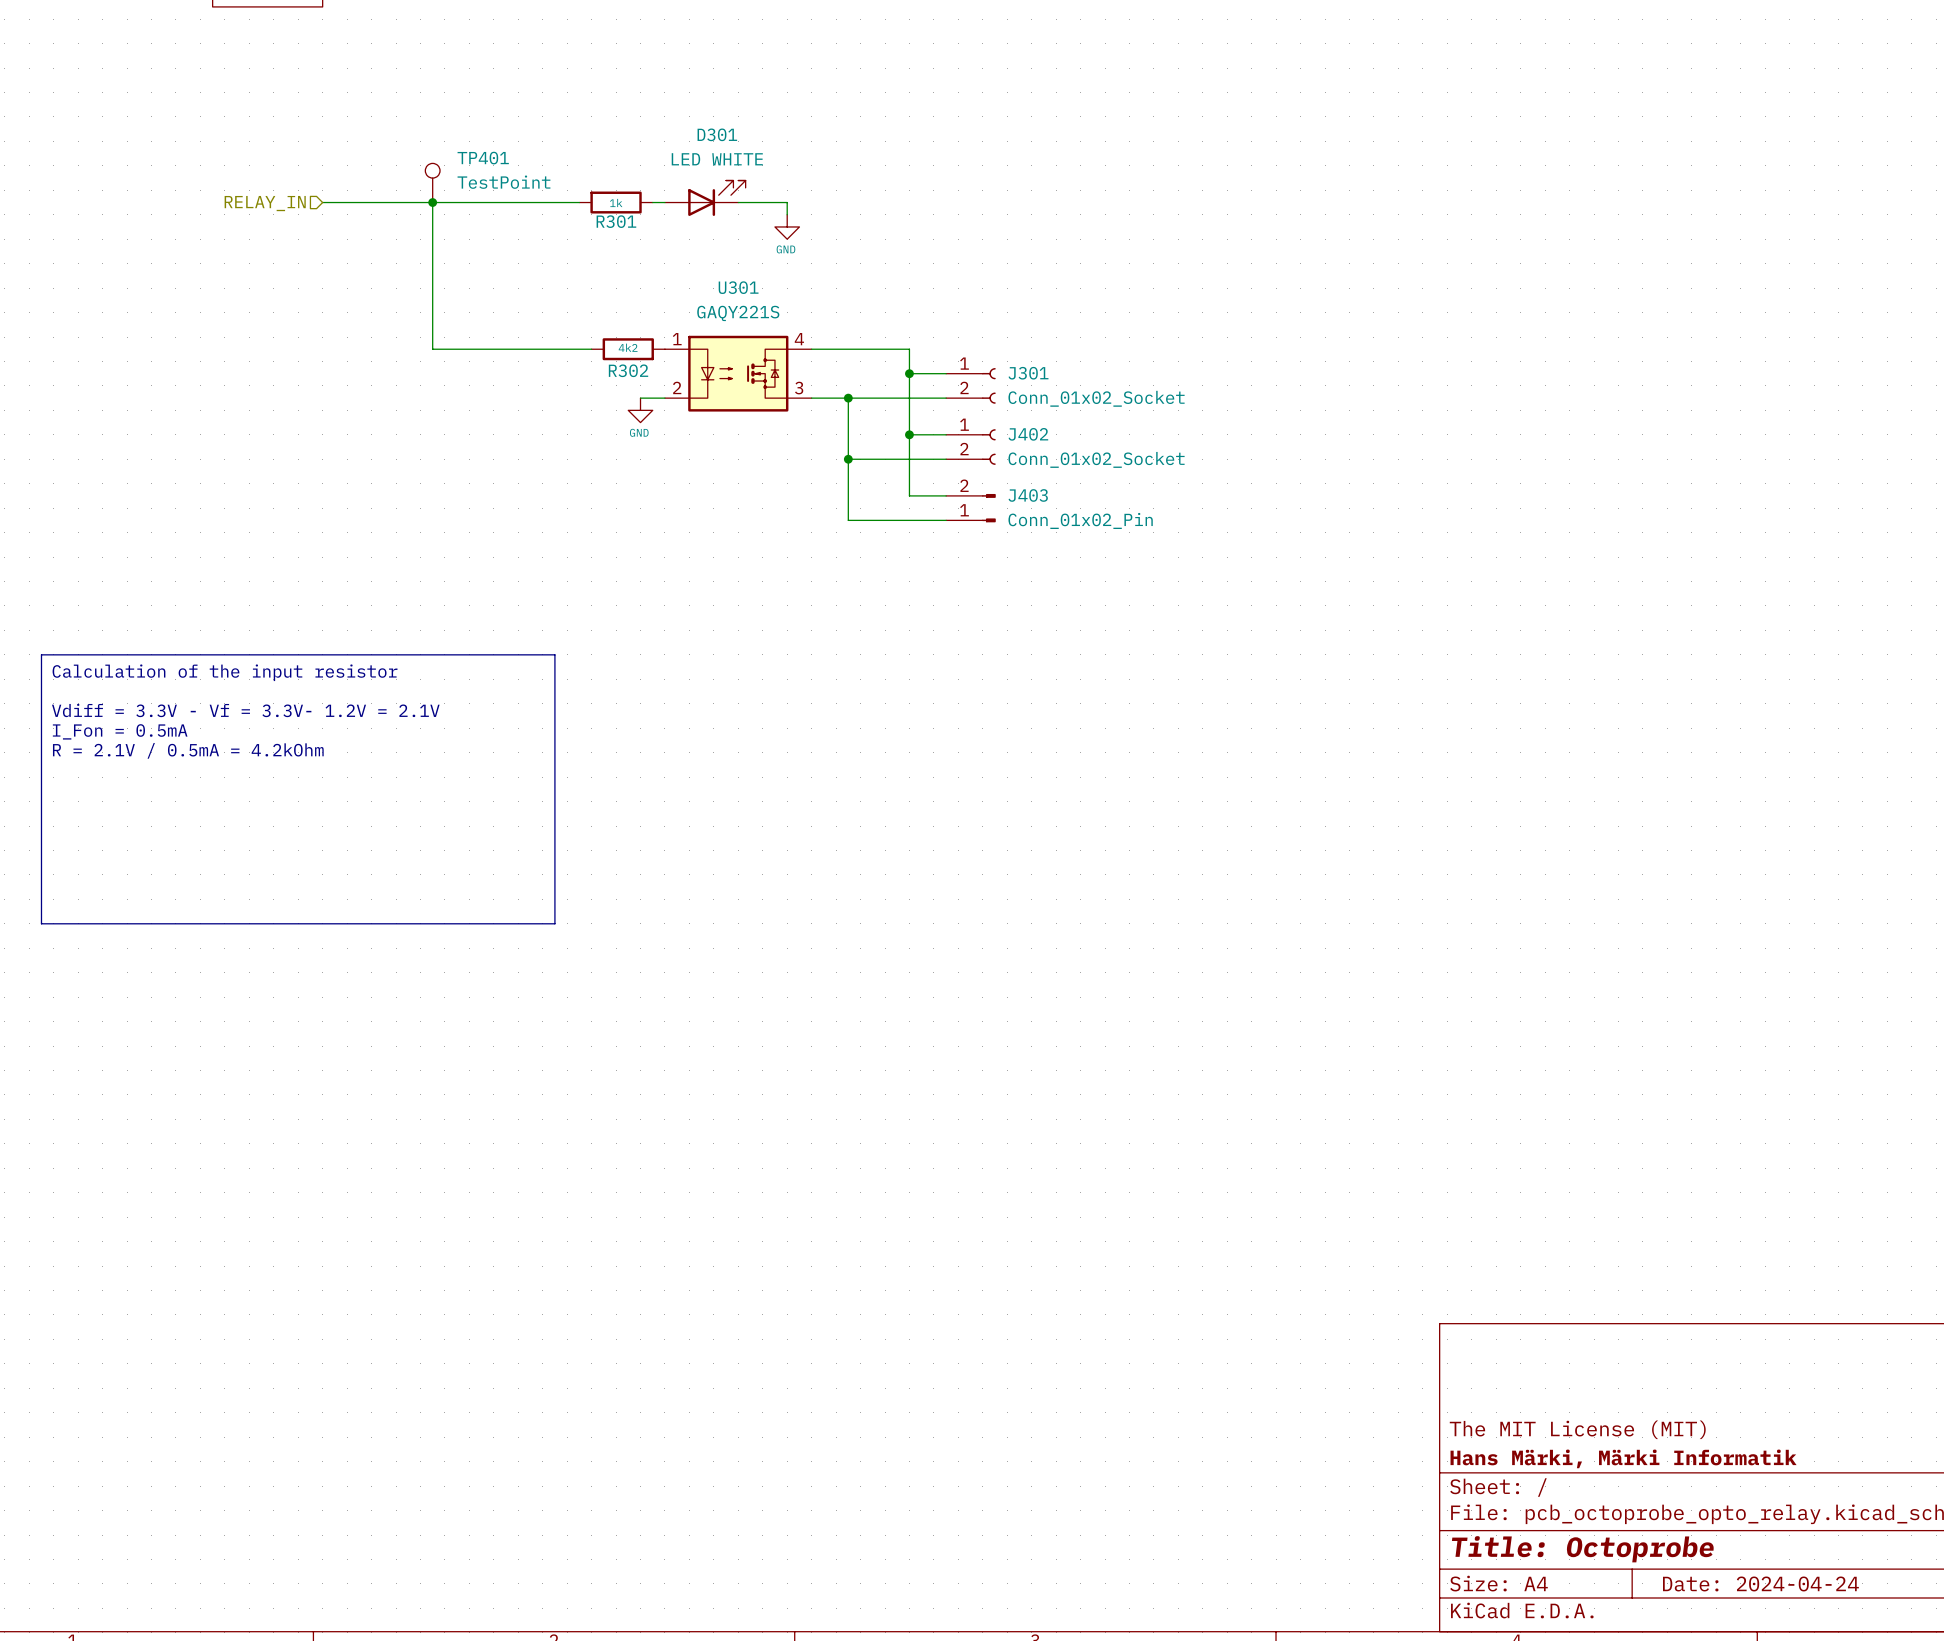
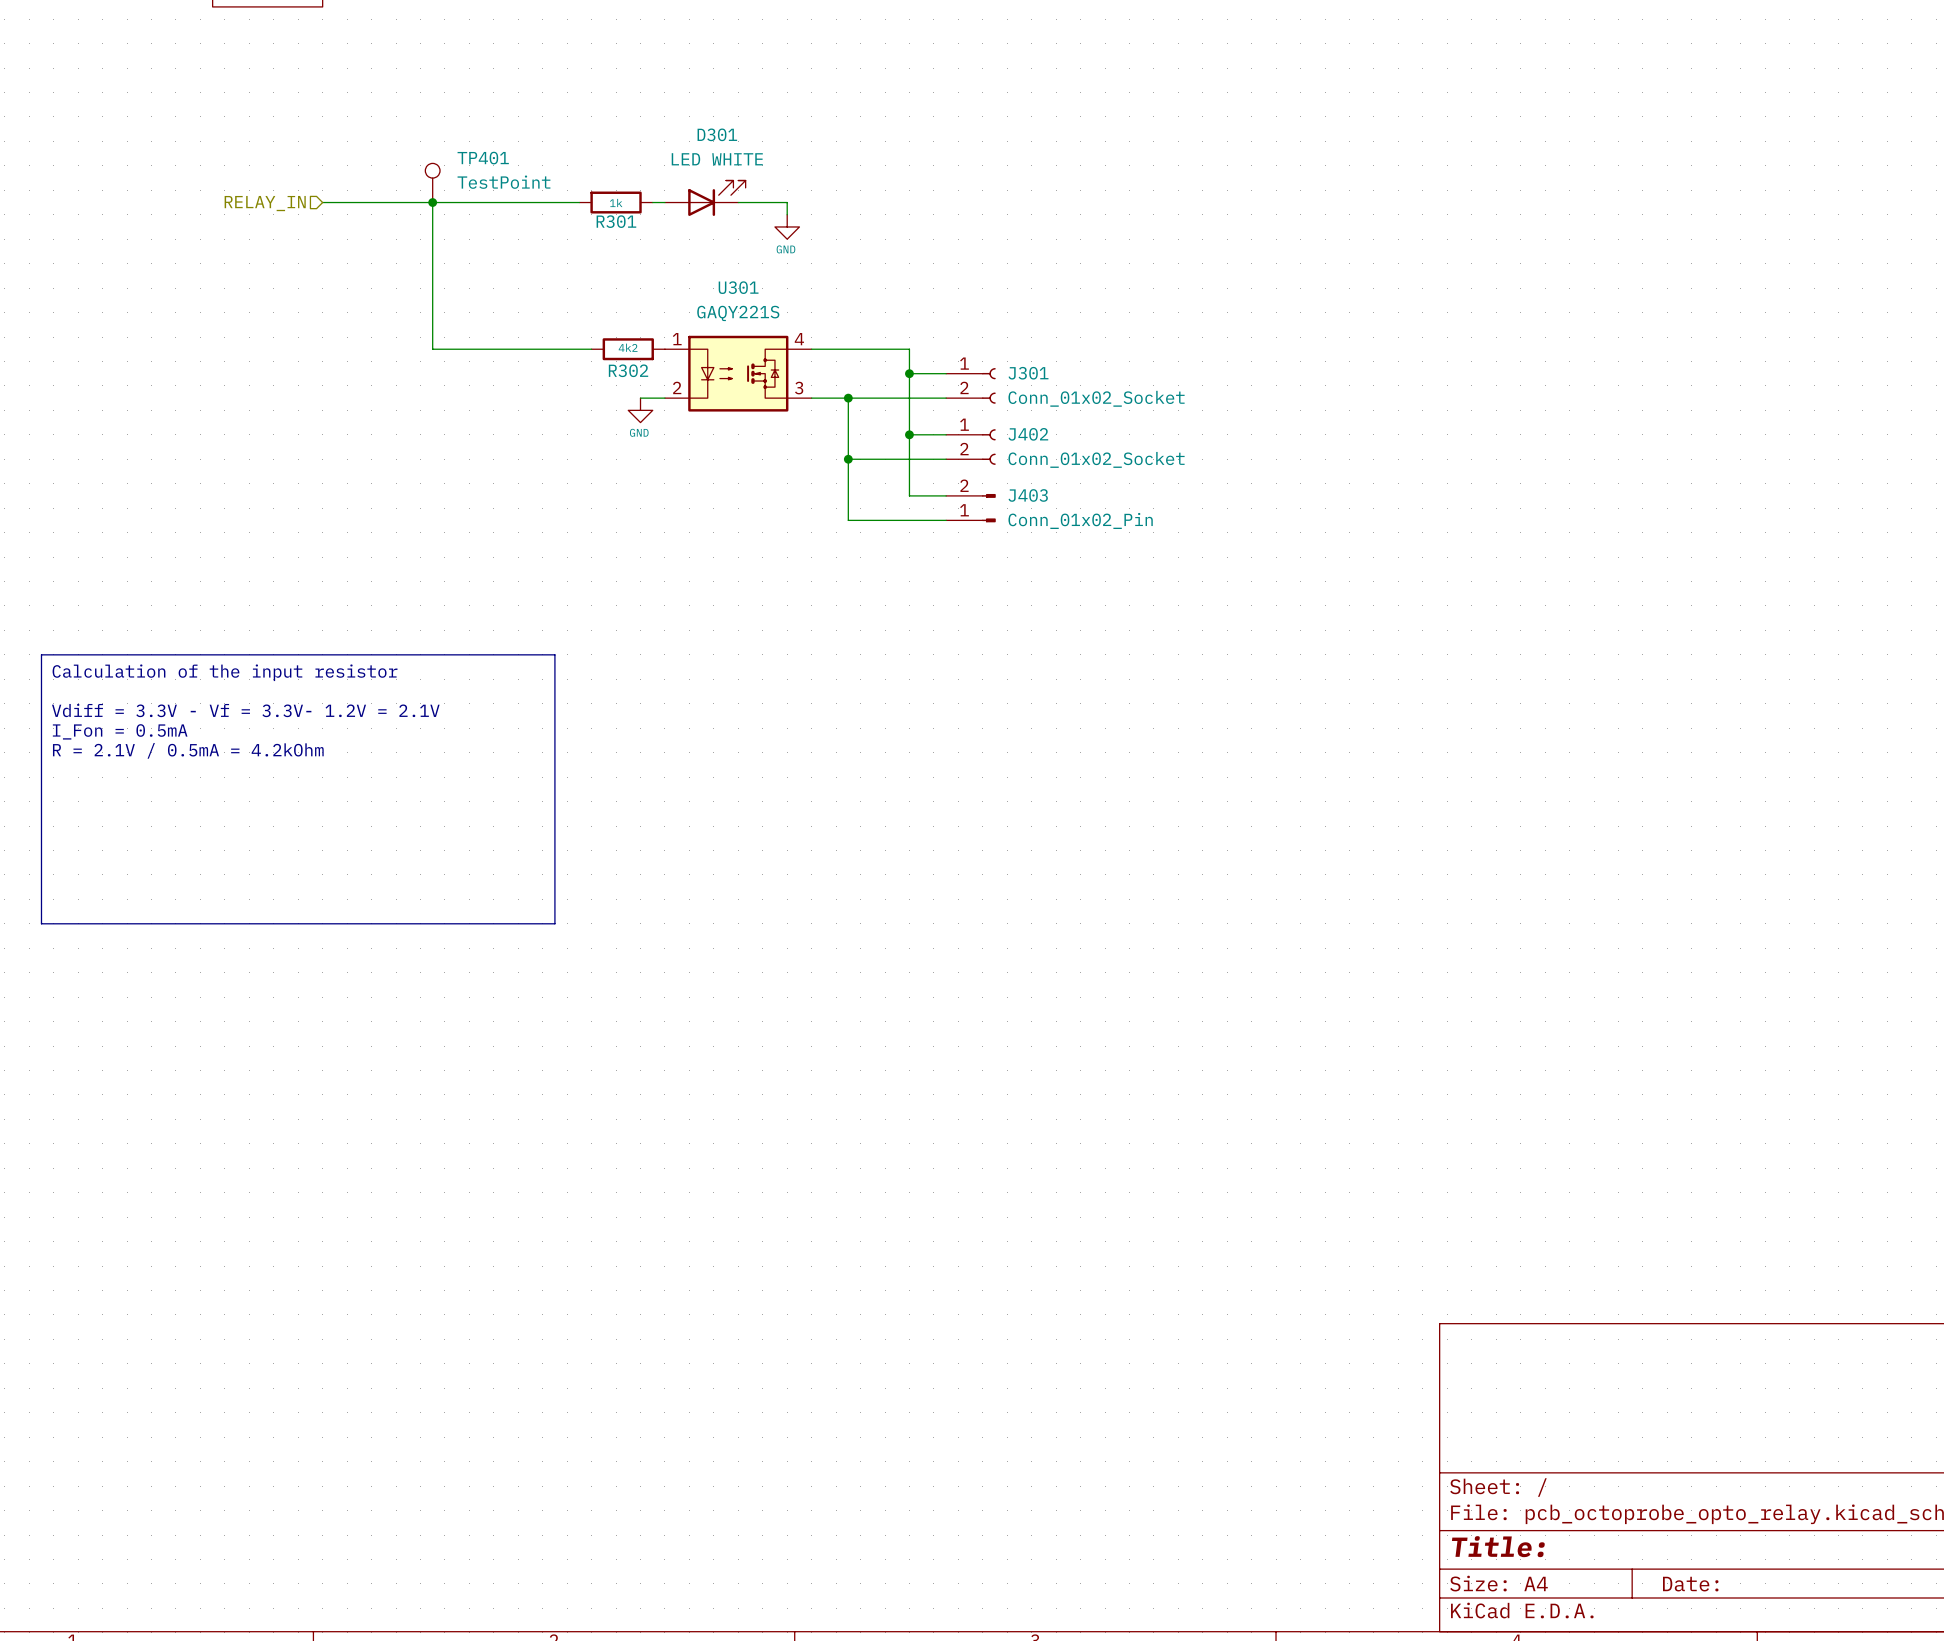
title block: The MIT License (MIT) (1577, 1429) -> none
title block: Hans Märki, Märki Informatik (1623, 1458) -> none
title block: Title: Octoprobe (1582, 1549) -> Title: (1498, 1546)
title block: Date: 2024-04-24 (1760, 1583) -> Date: (1690, 1584)

